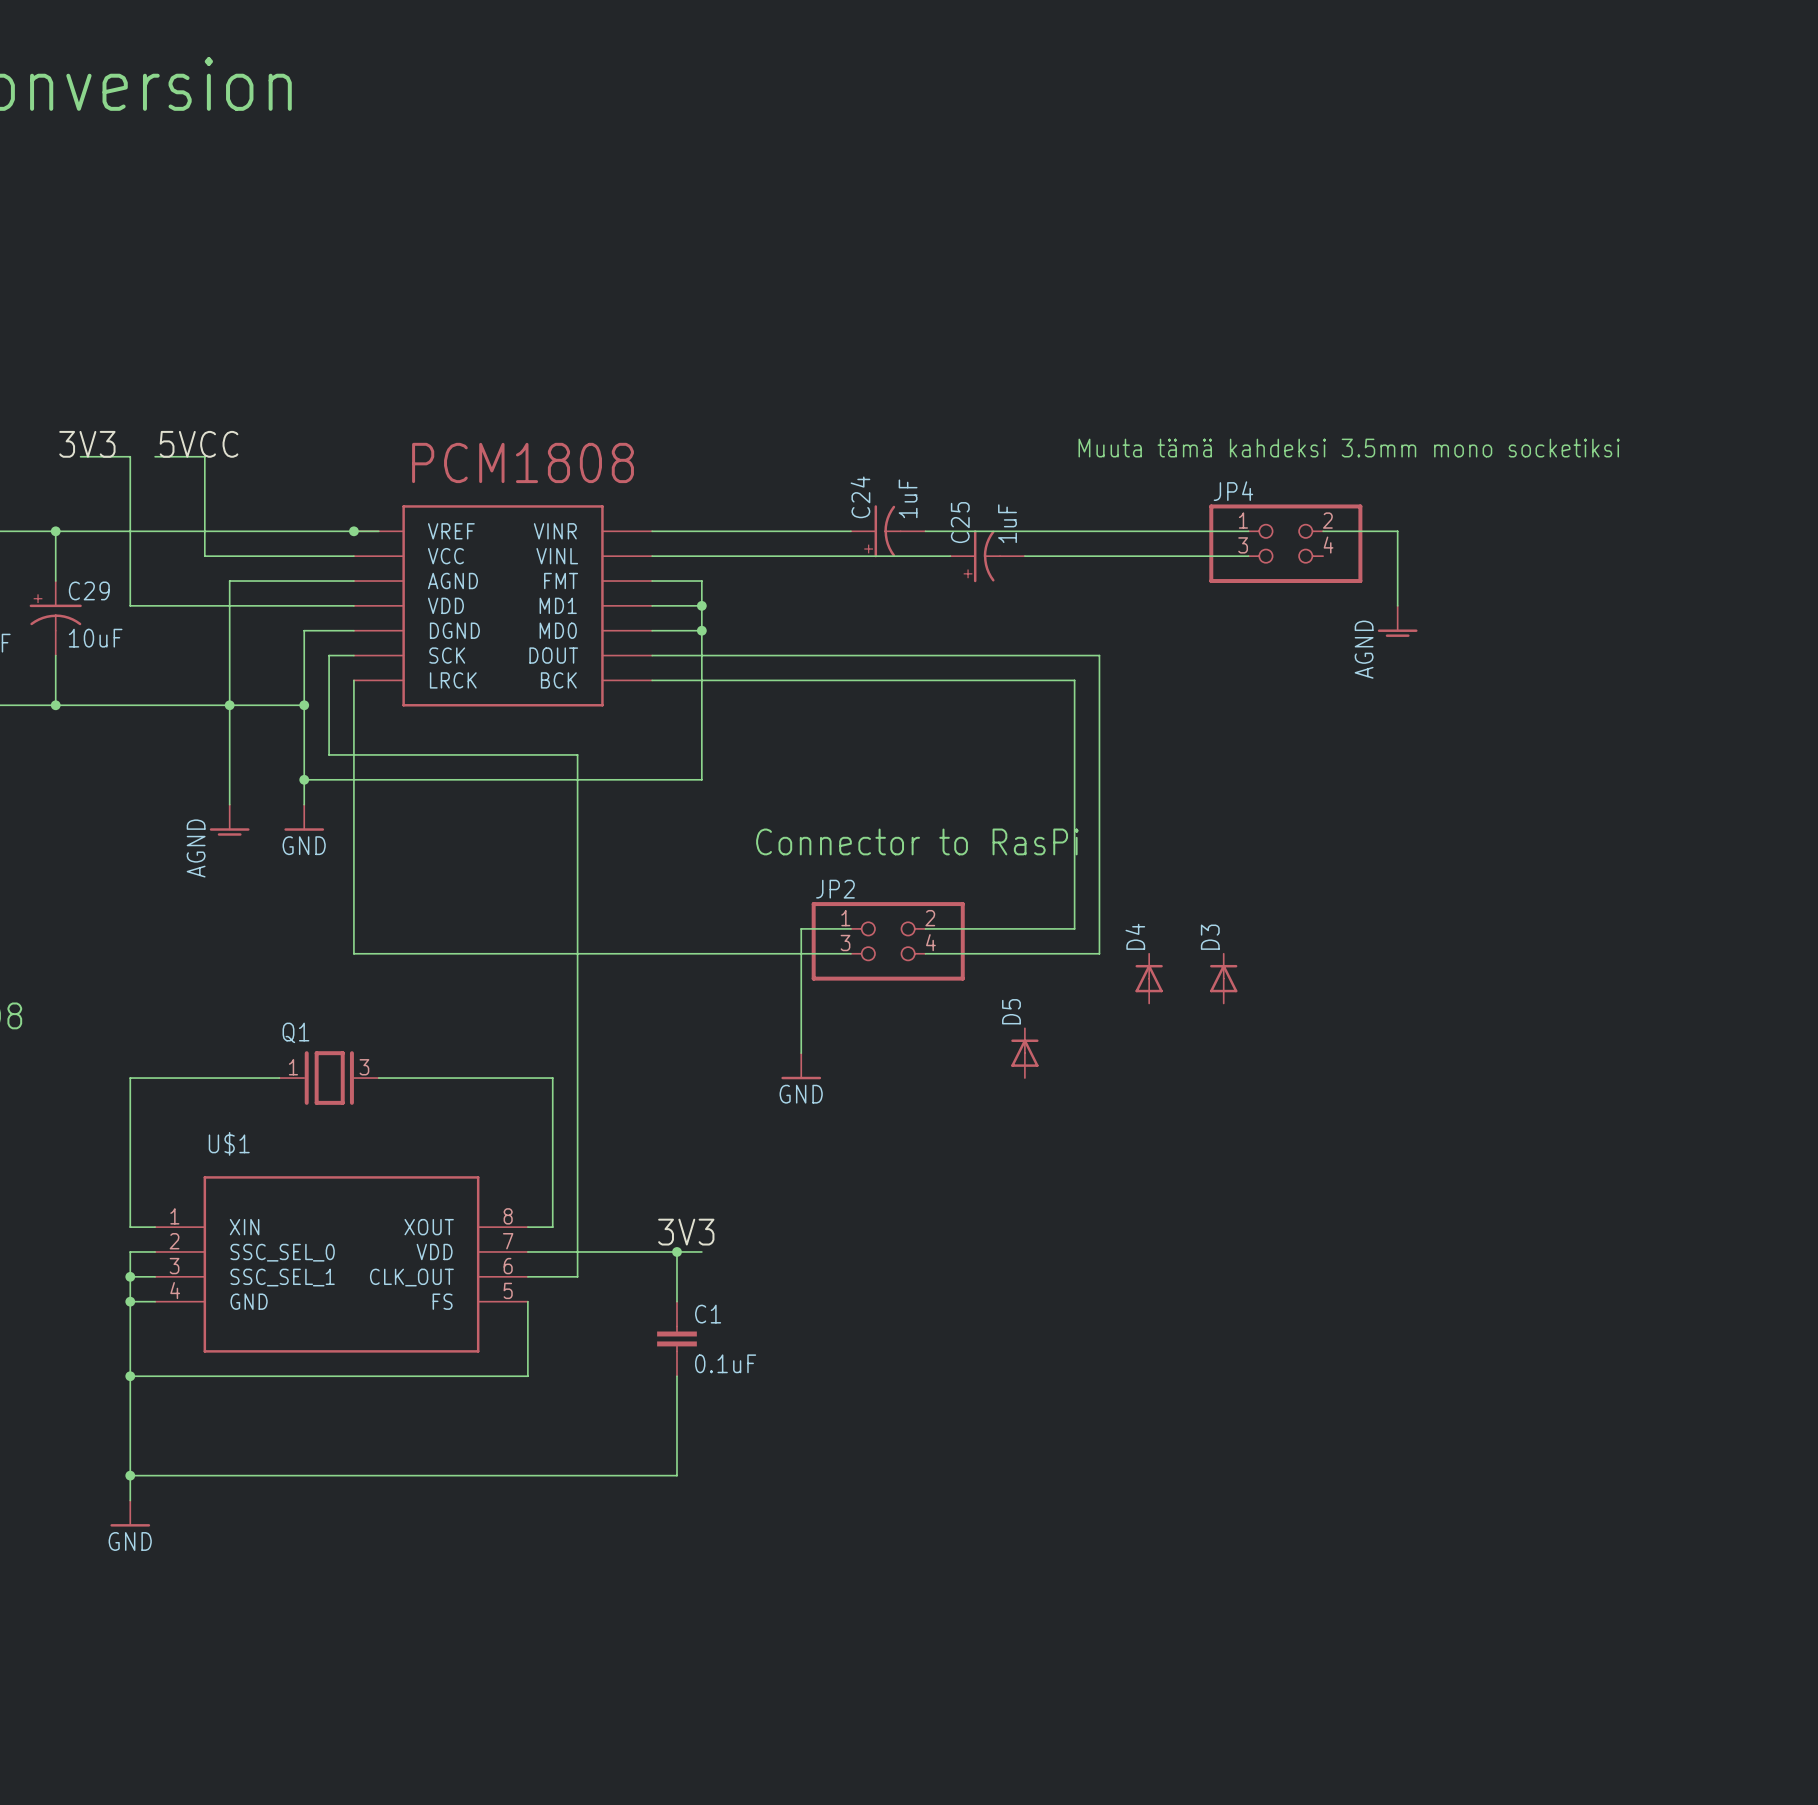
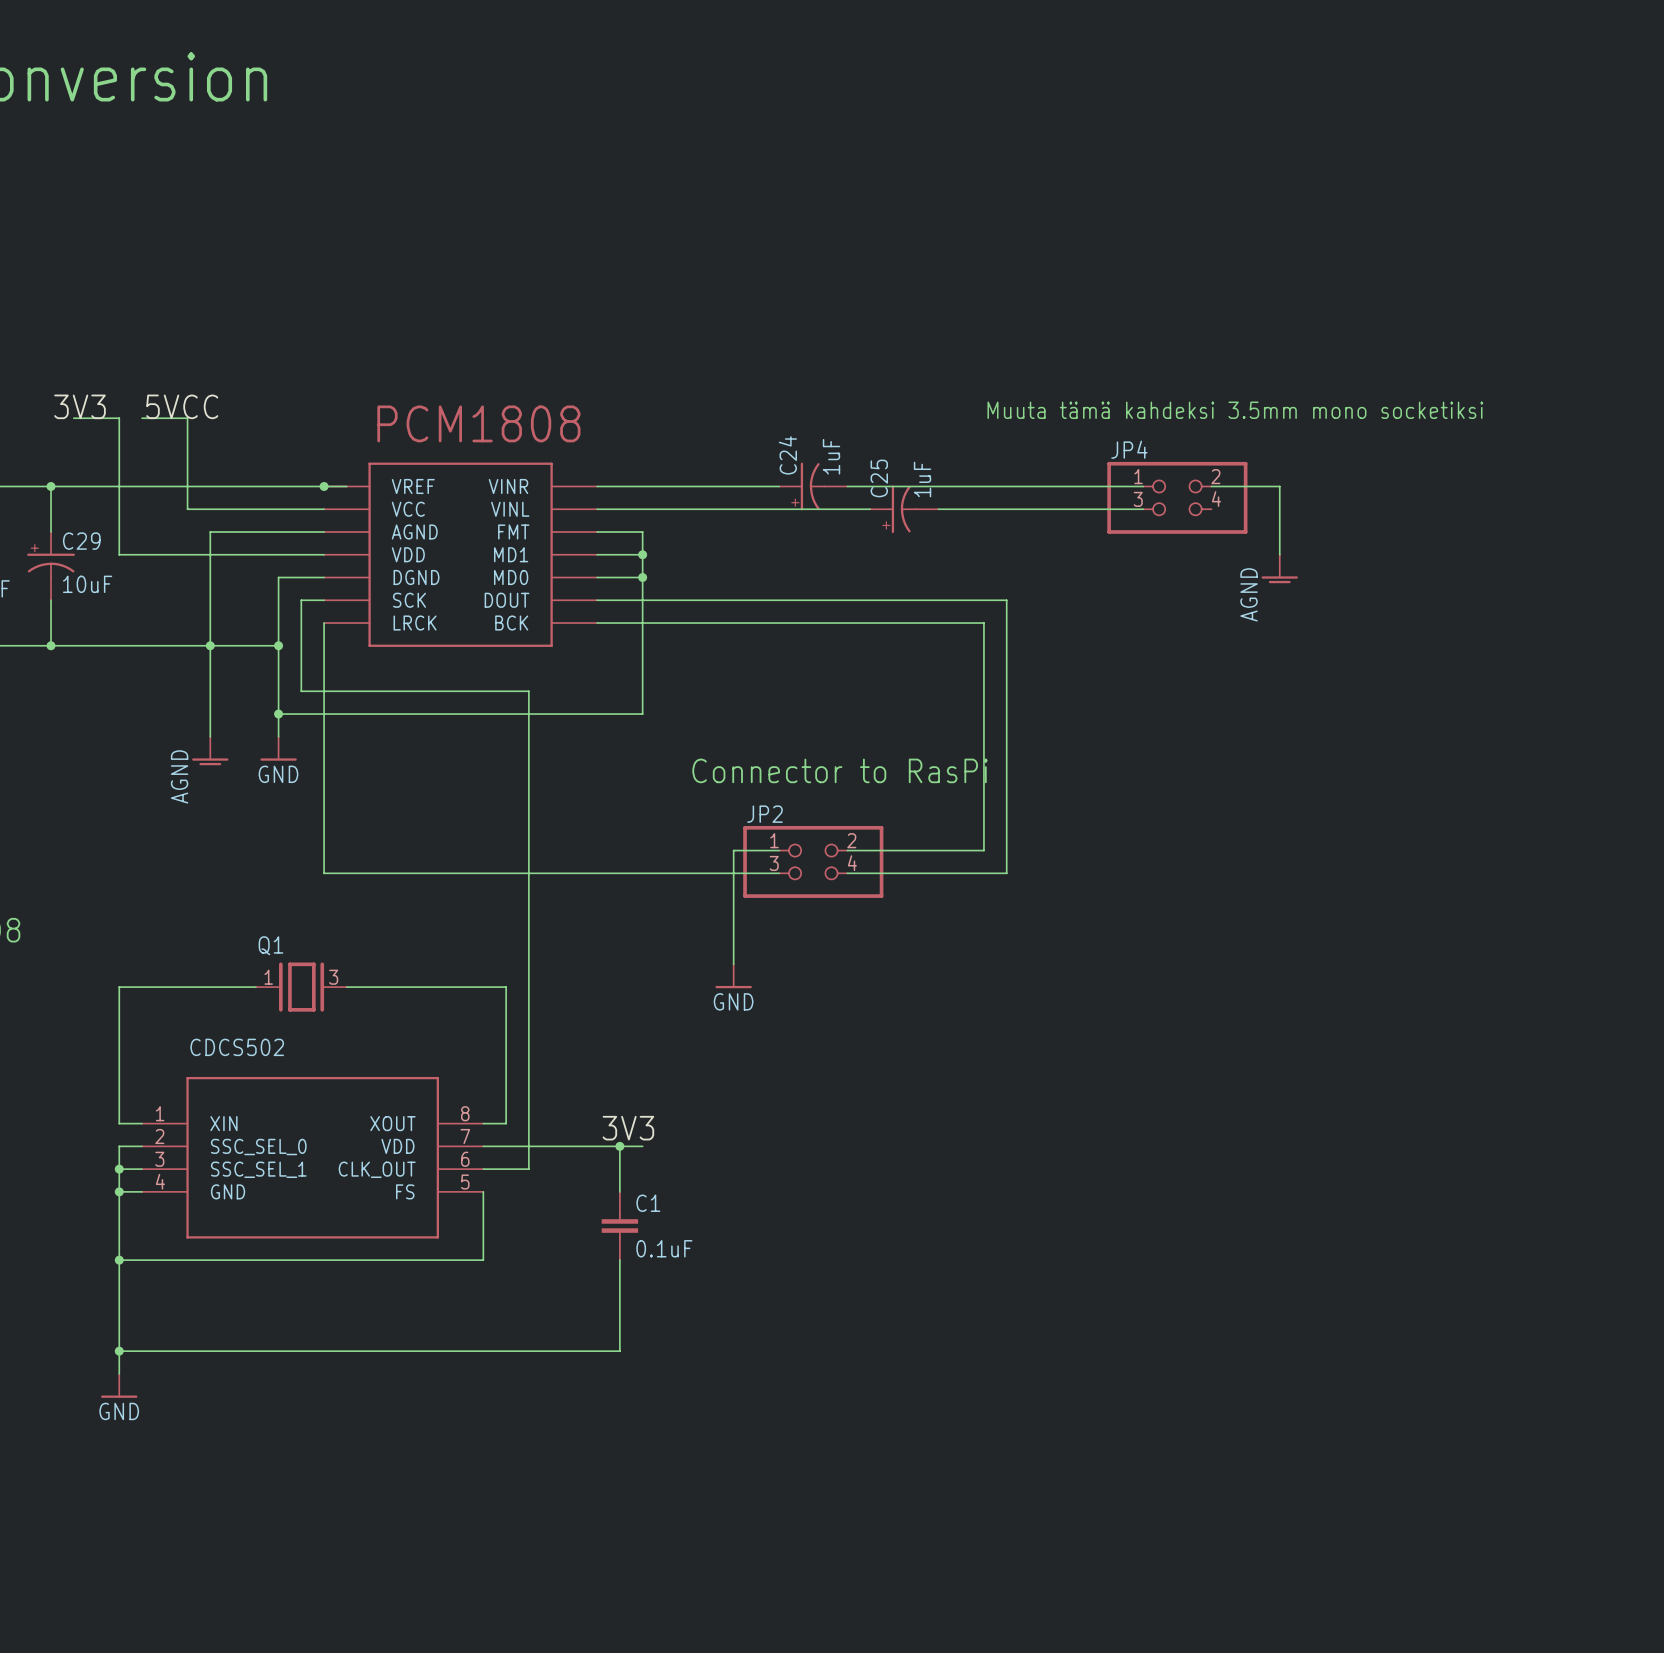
D4: (1149, 978) -> none
D3: (1223, 978) -> none
D5: (1024, 1053) -> none
U$1 name: U$1 (229, 1143) -> CDCS502 (237, 1047)

